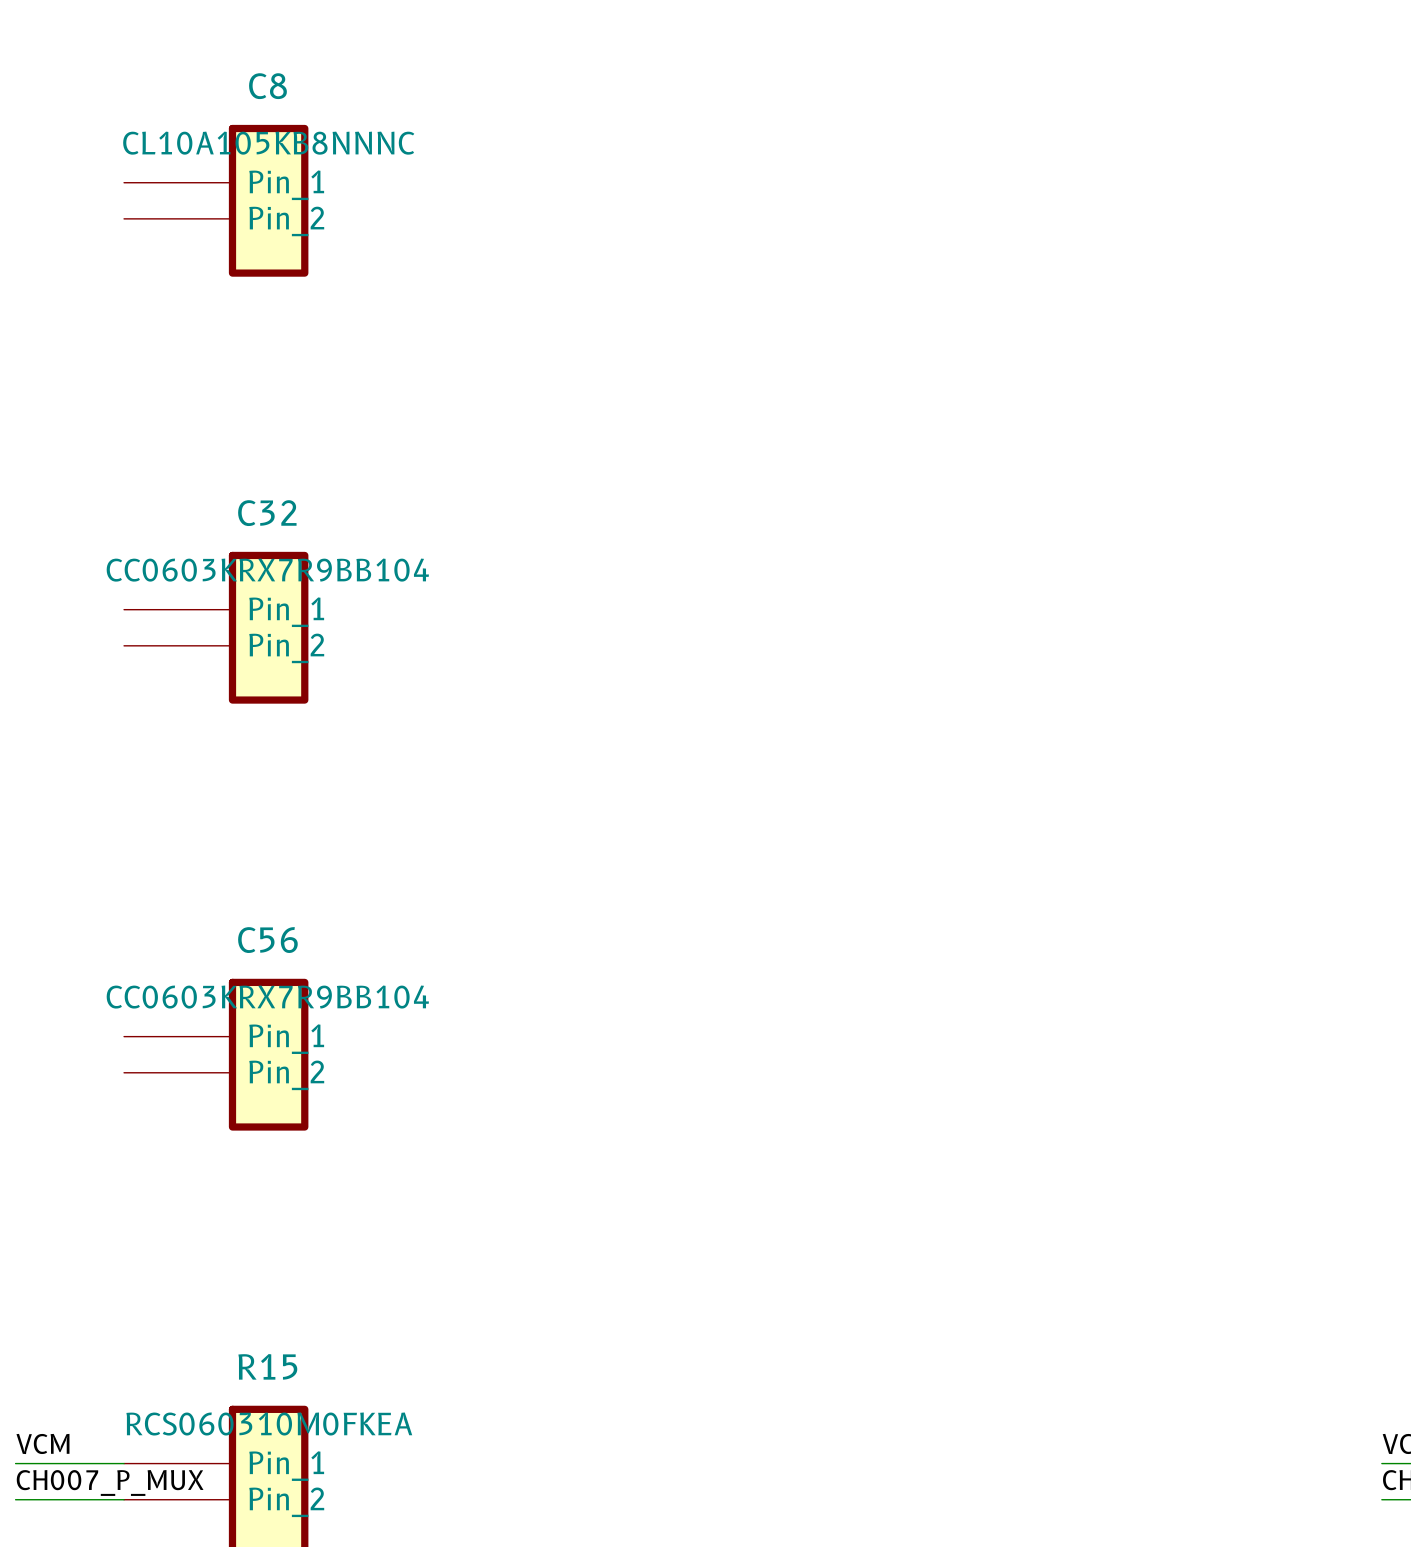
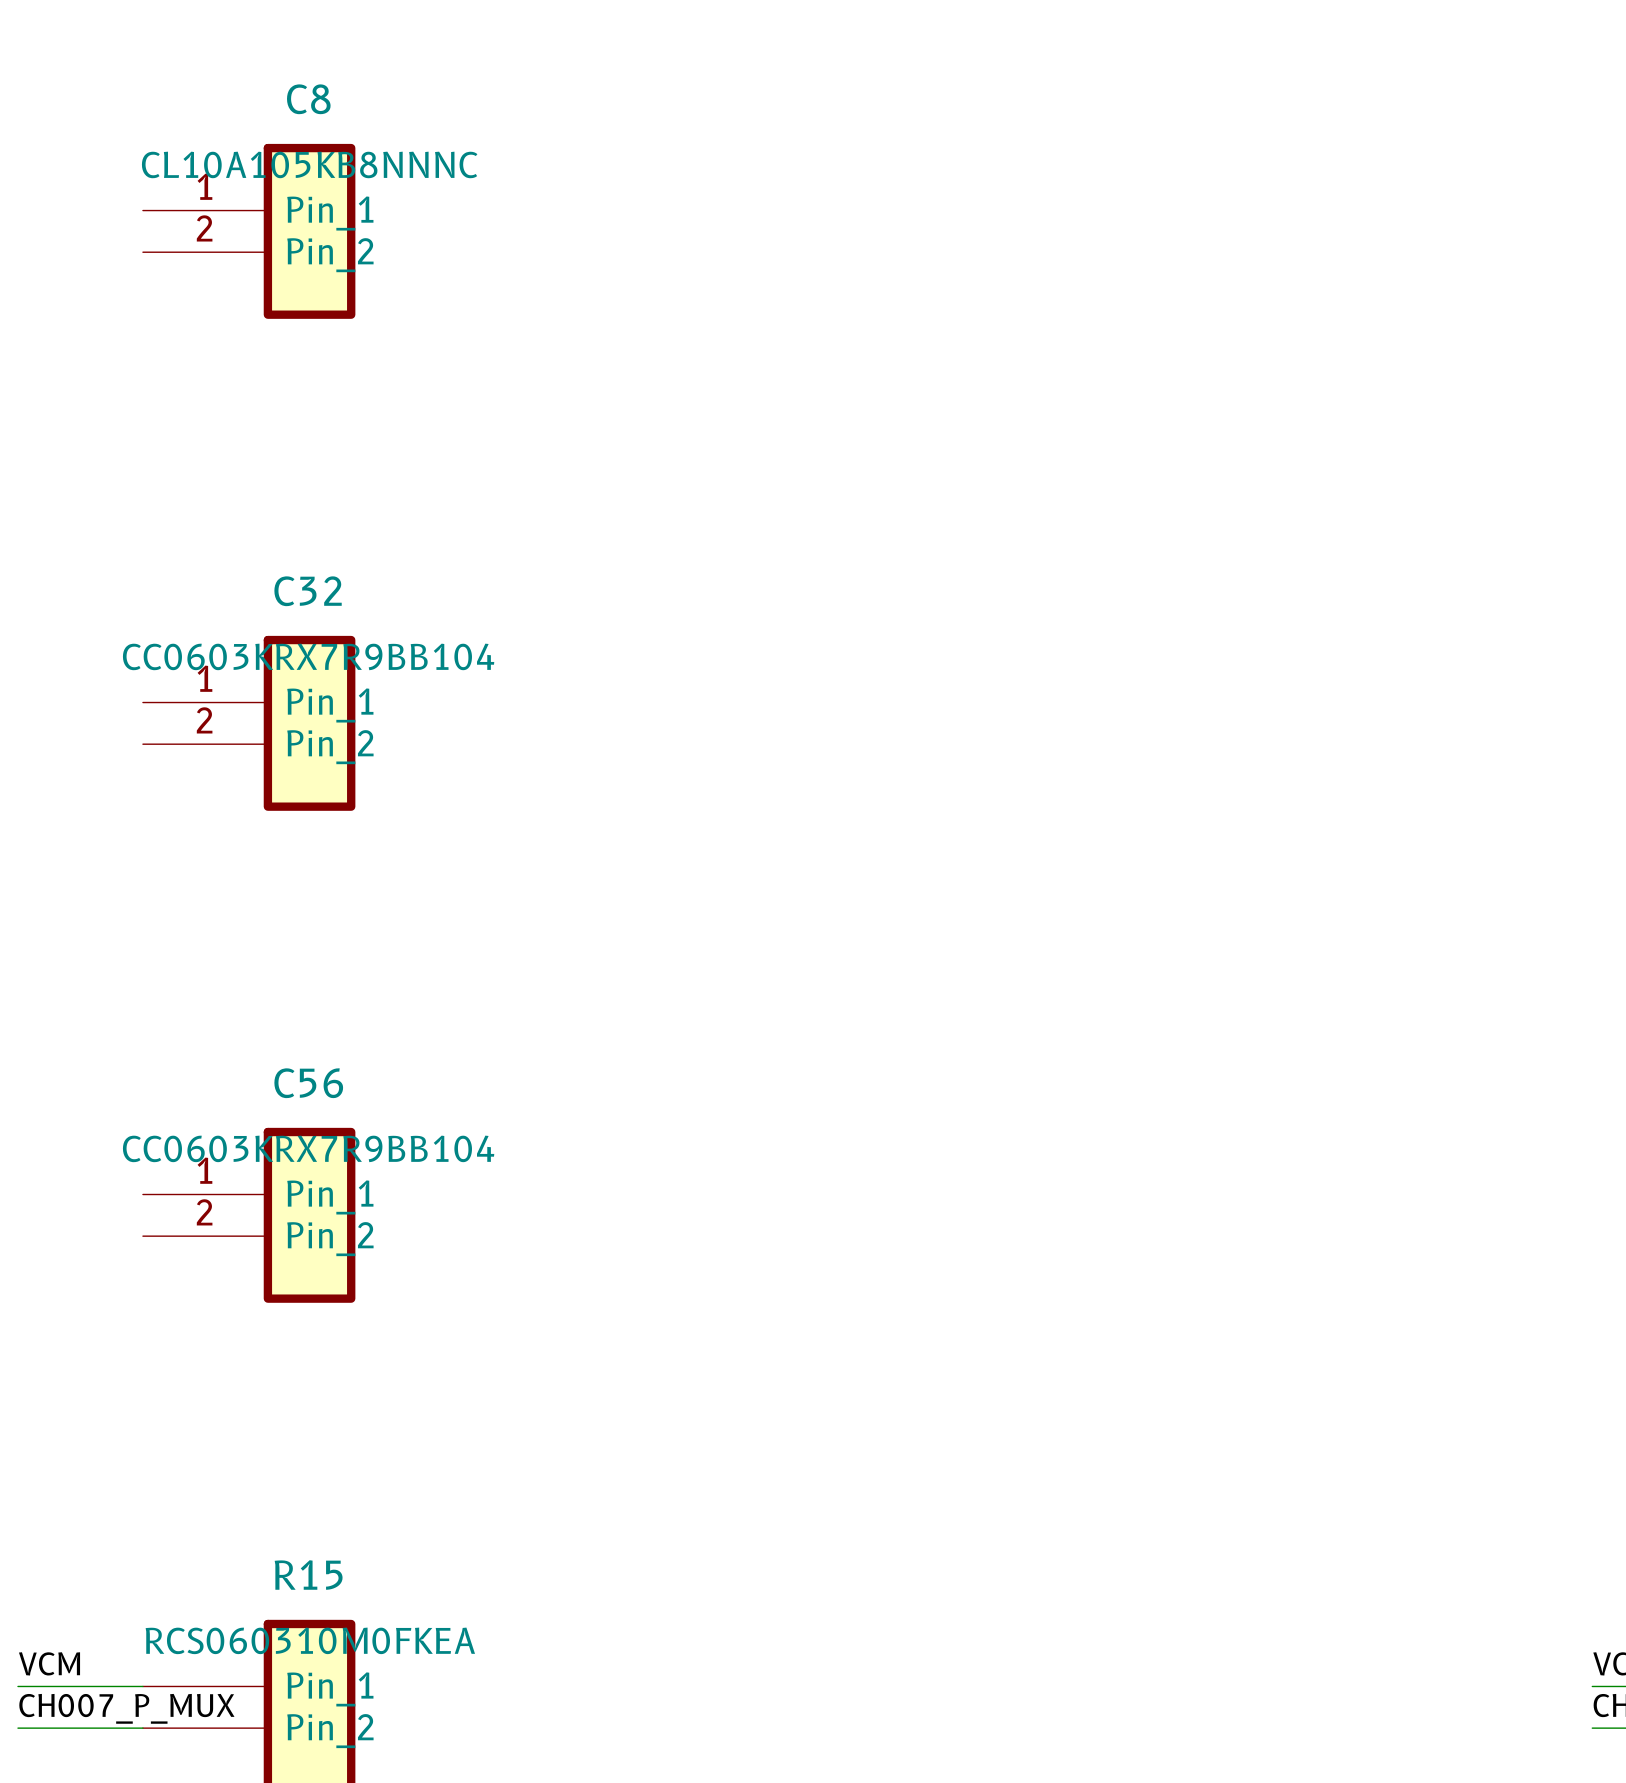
C8 pin number: none -> 1 (204, 186)
C8 pin number: none -> 2 (204, 228)
C32 pin number: none -> 1 (204, 678)
C32 pin number: none -> 2 (204, 720)
C56 pin number: none -> 1 (204, 1170)
C56 pin number: none -> 2 (204, 1212)

